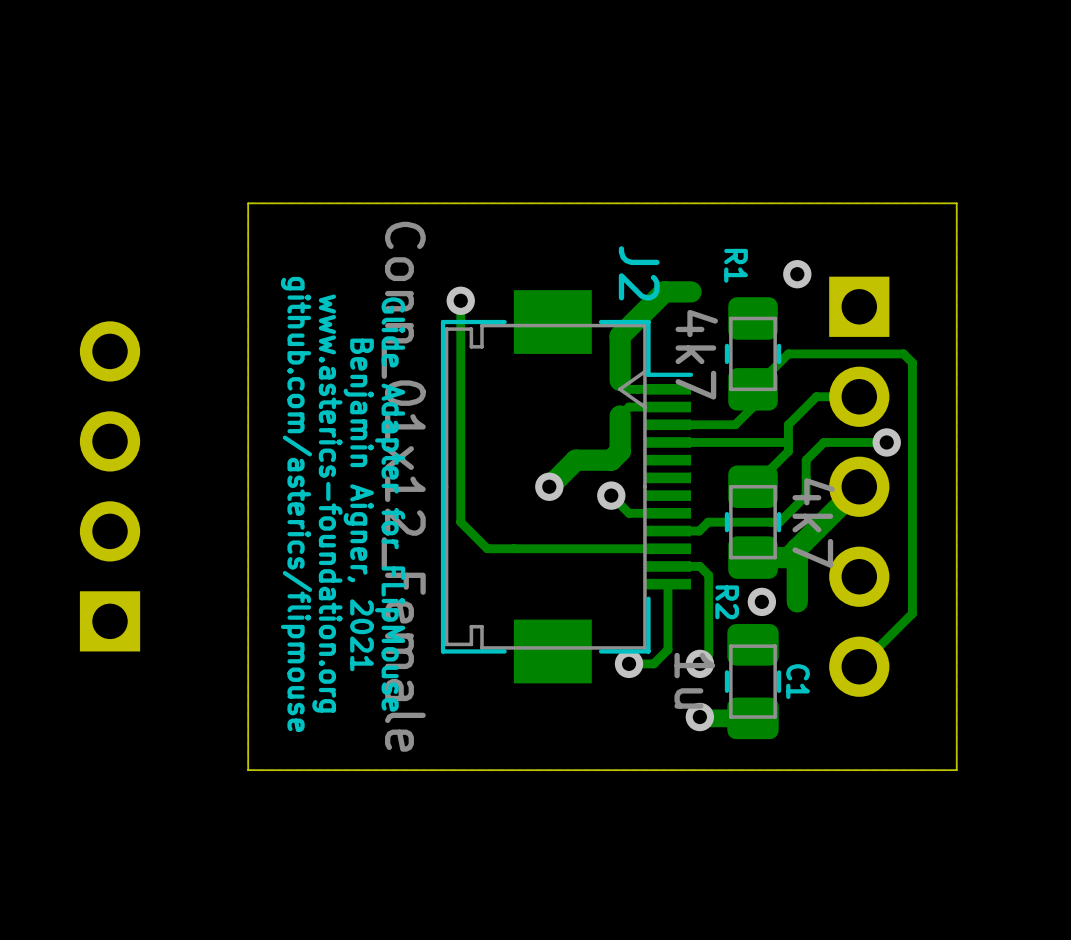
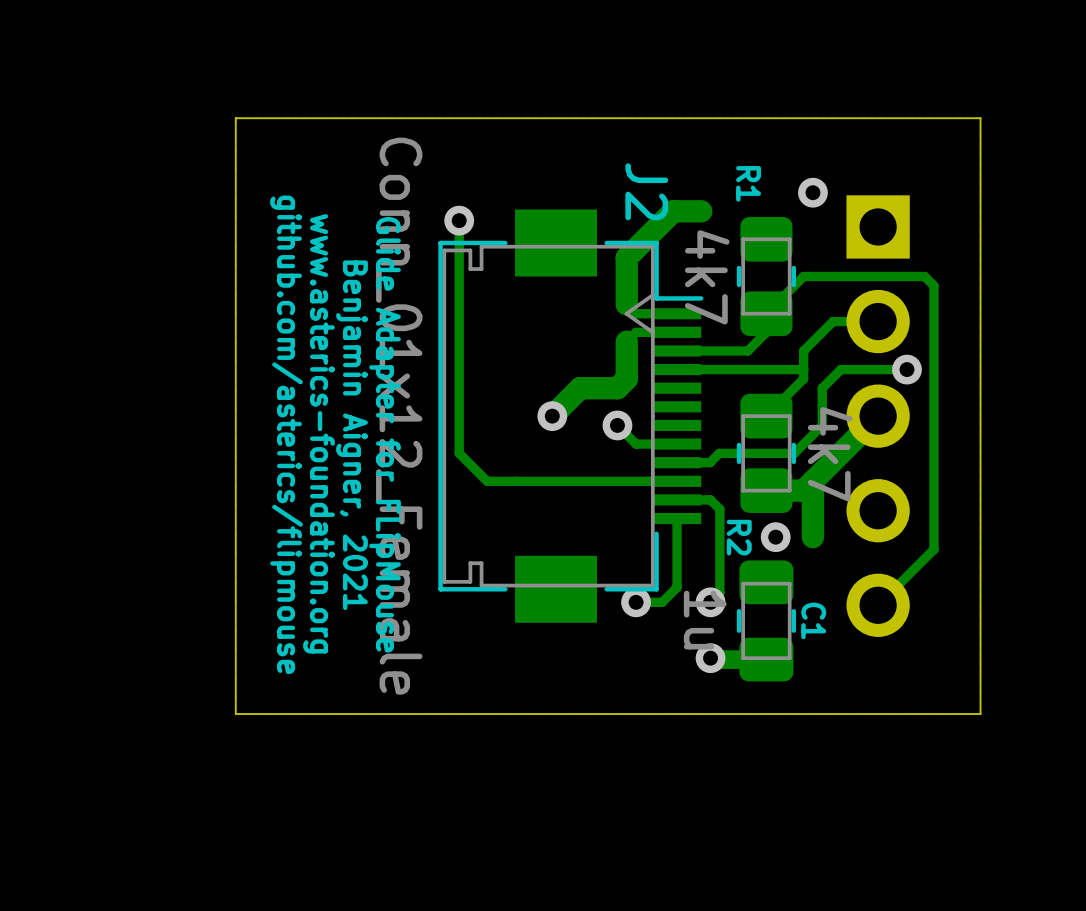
part: (110, 486) -> none

